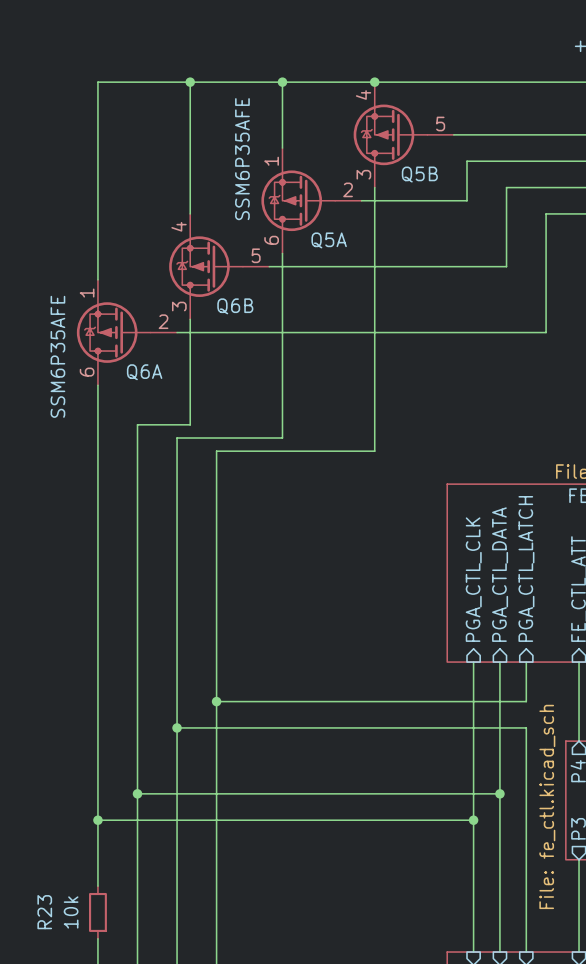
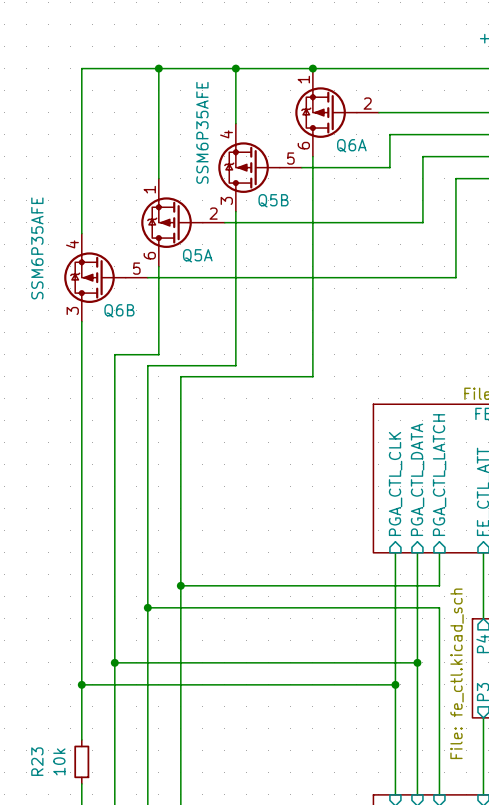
Q5B position: (403, 134) -> (260, 167)
Q5A position: (311, 200) -> (183, 222)
Q6B position: (219, 266) -> (106, 277)
Q6A position: (126, 332) -> (337, 112)
Q6B value position: SSM6P35AFE (57, 356) -> SSM6P35AFE (37, 248)

